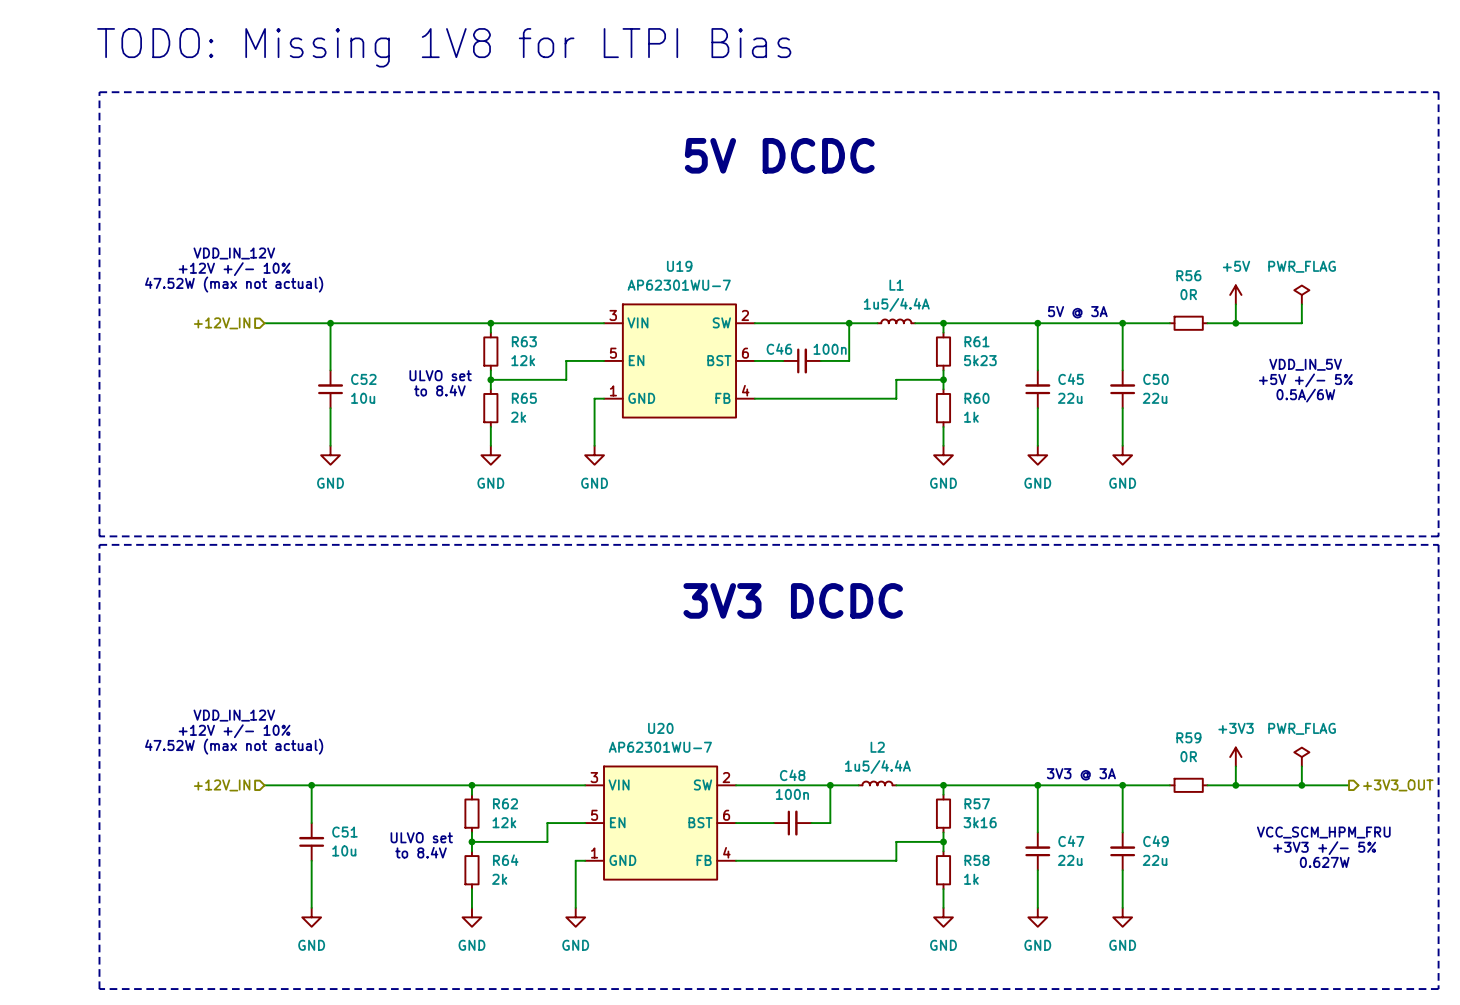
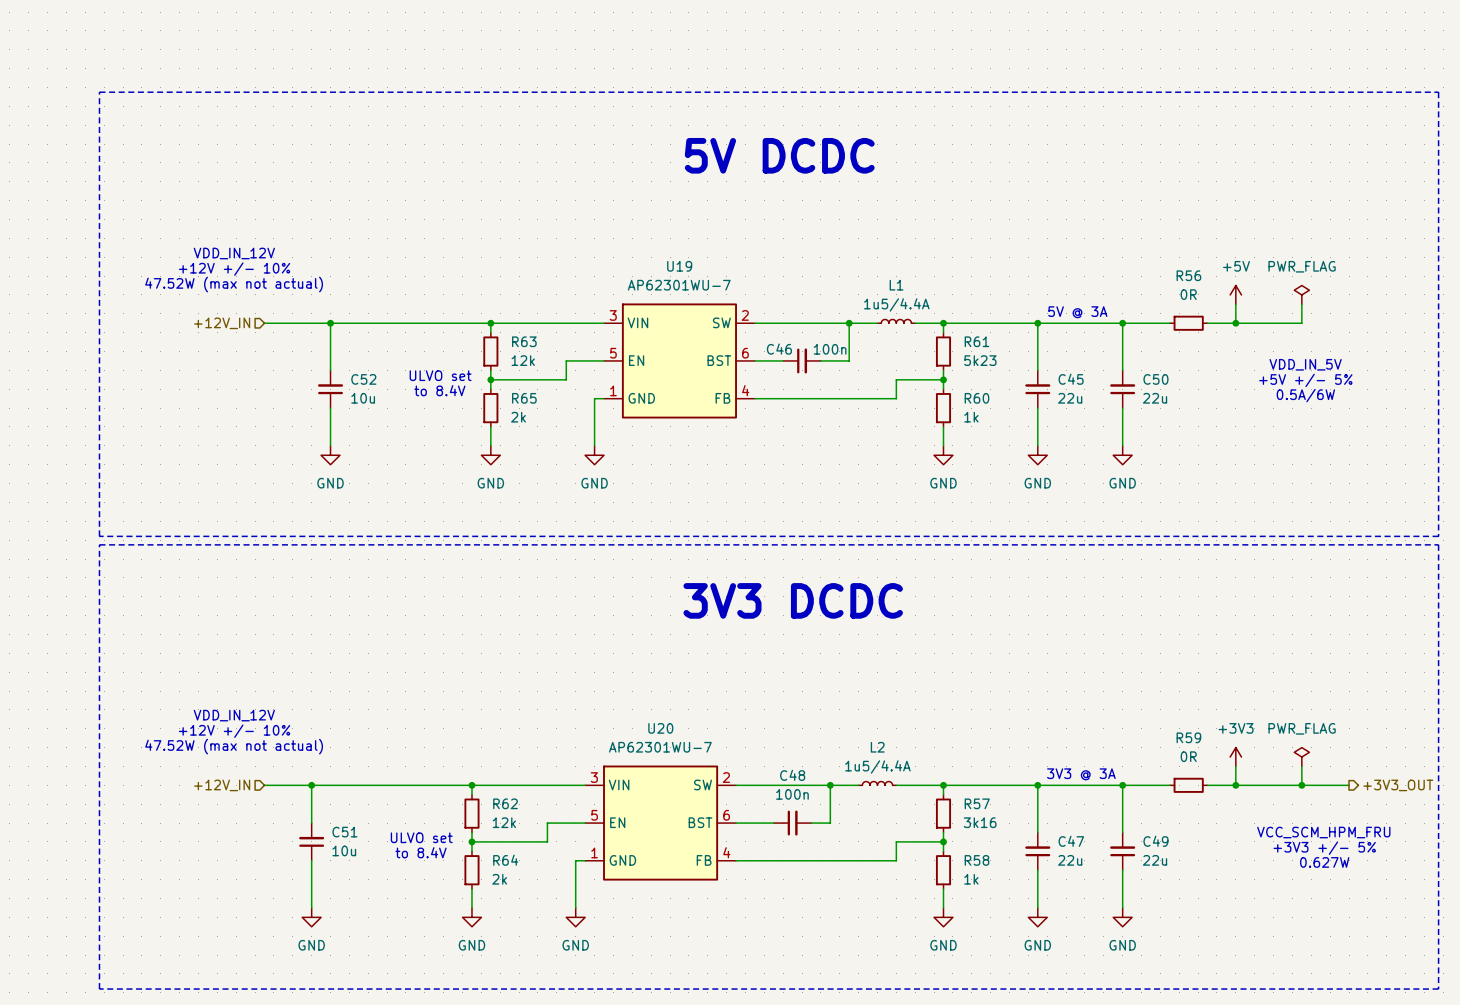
text: TODO: Missing 1V8 for LTPI Bias (444, 47) -> none

